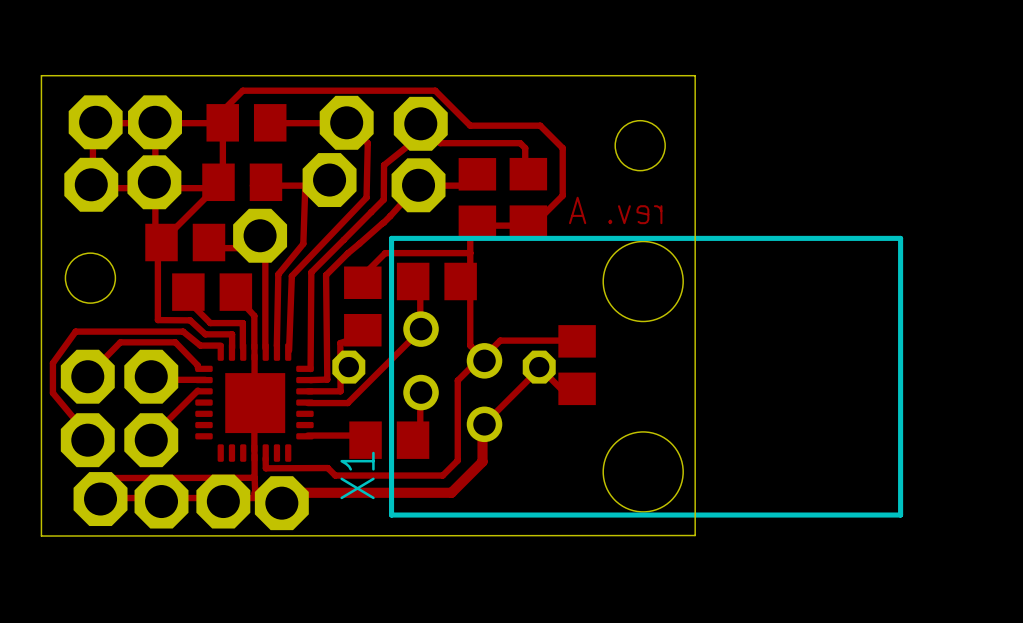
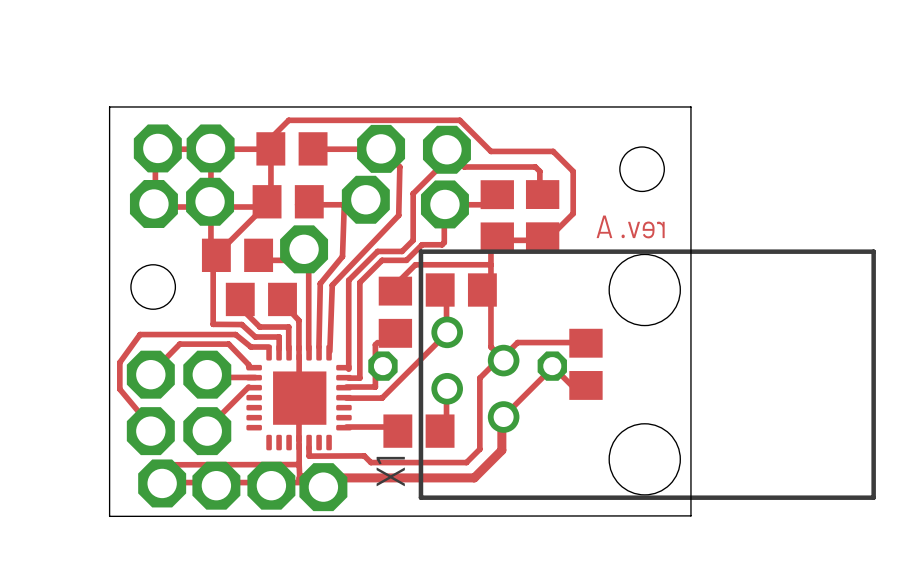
top track: (417, 138) (384, 165) (383, 199) (311, 272) (310, 369) -> (444, 162) (413, 193) (413, 240) (402, 251) (377, 251) (348, 280) (348, 369)
top track: (417, 185) (383, 222) (326, 275) (327, 379) (310, 380) -> (444, 204) (444, 242) (442, 244) (422, 244) (406, 260) (382, 260) (359, 282) (359, 378) (348, 378)
top track: (362, 335) (340, 343) (340, 391) (308, 391) -> (377, 342) (375, 344) (375, 387) (346, 387)

